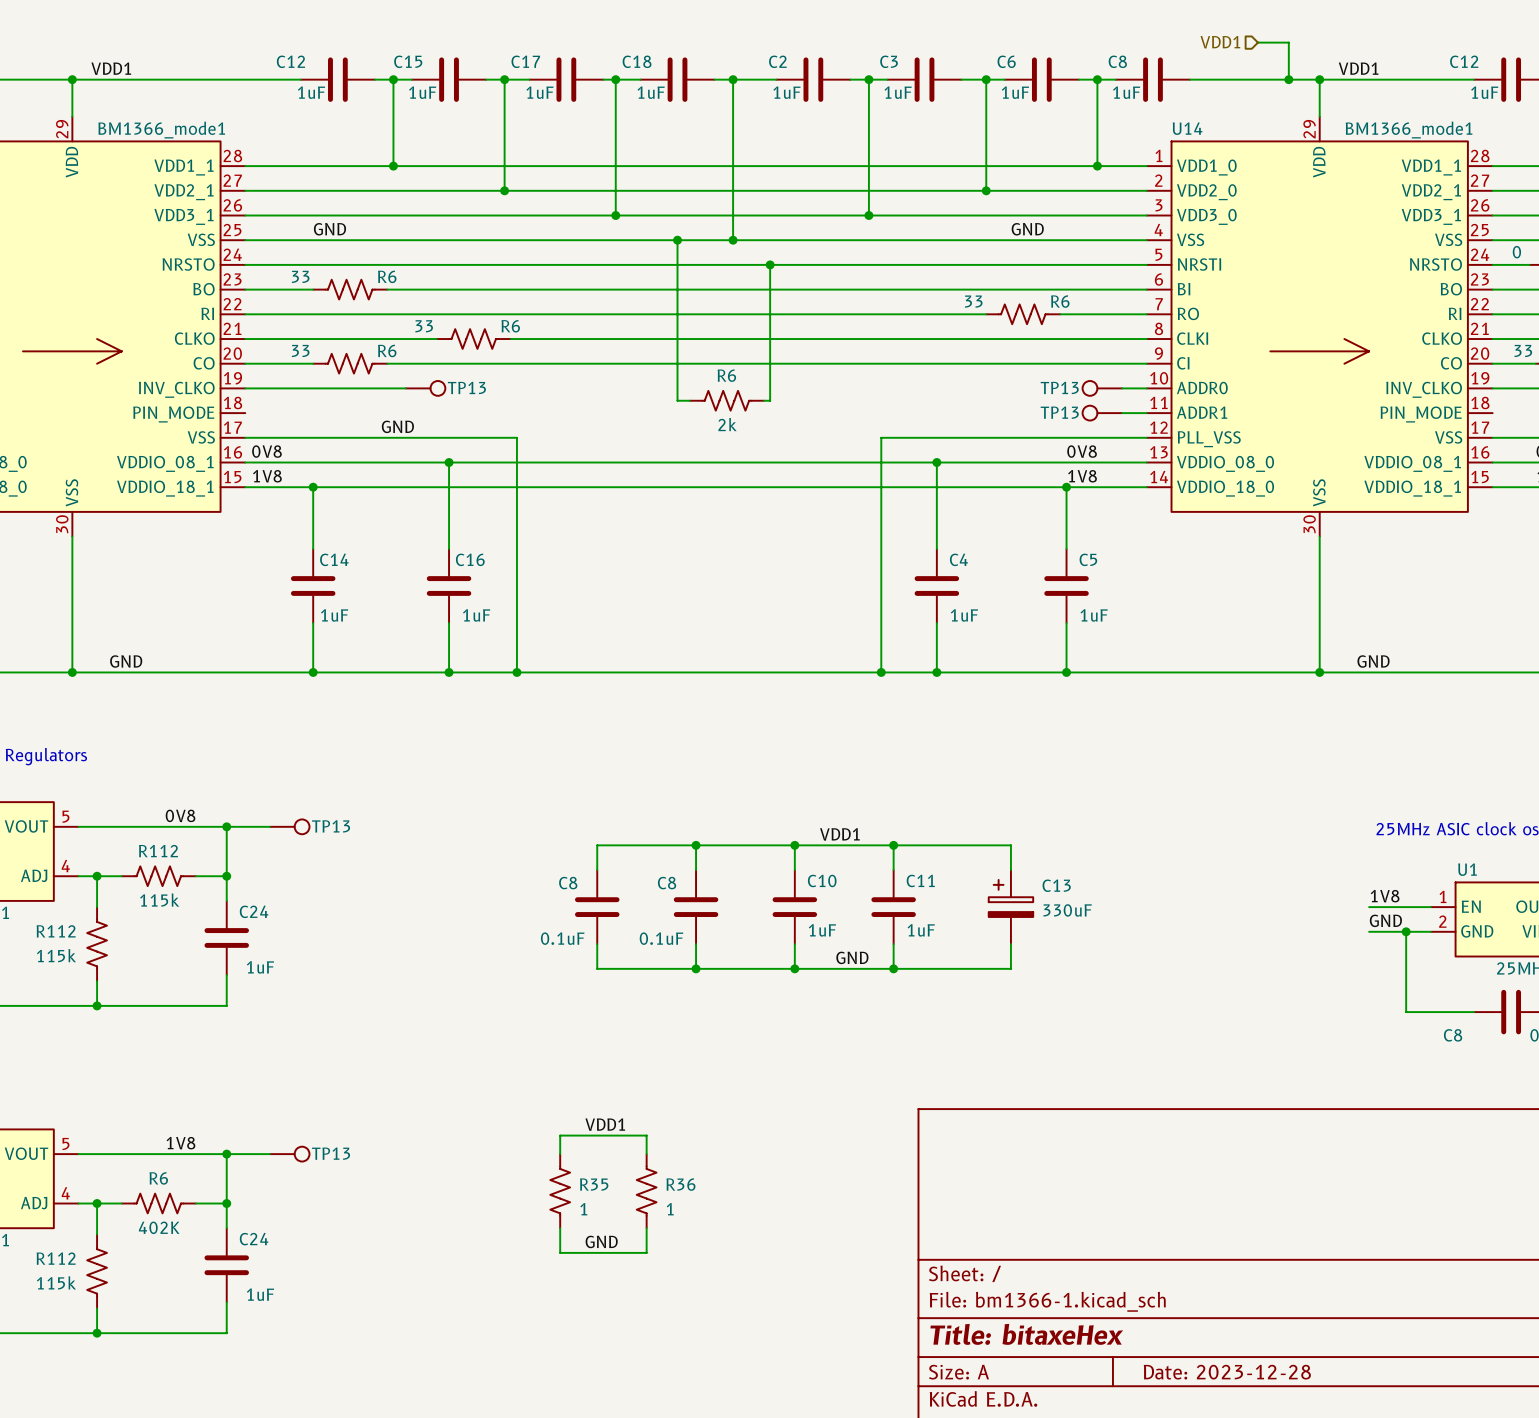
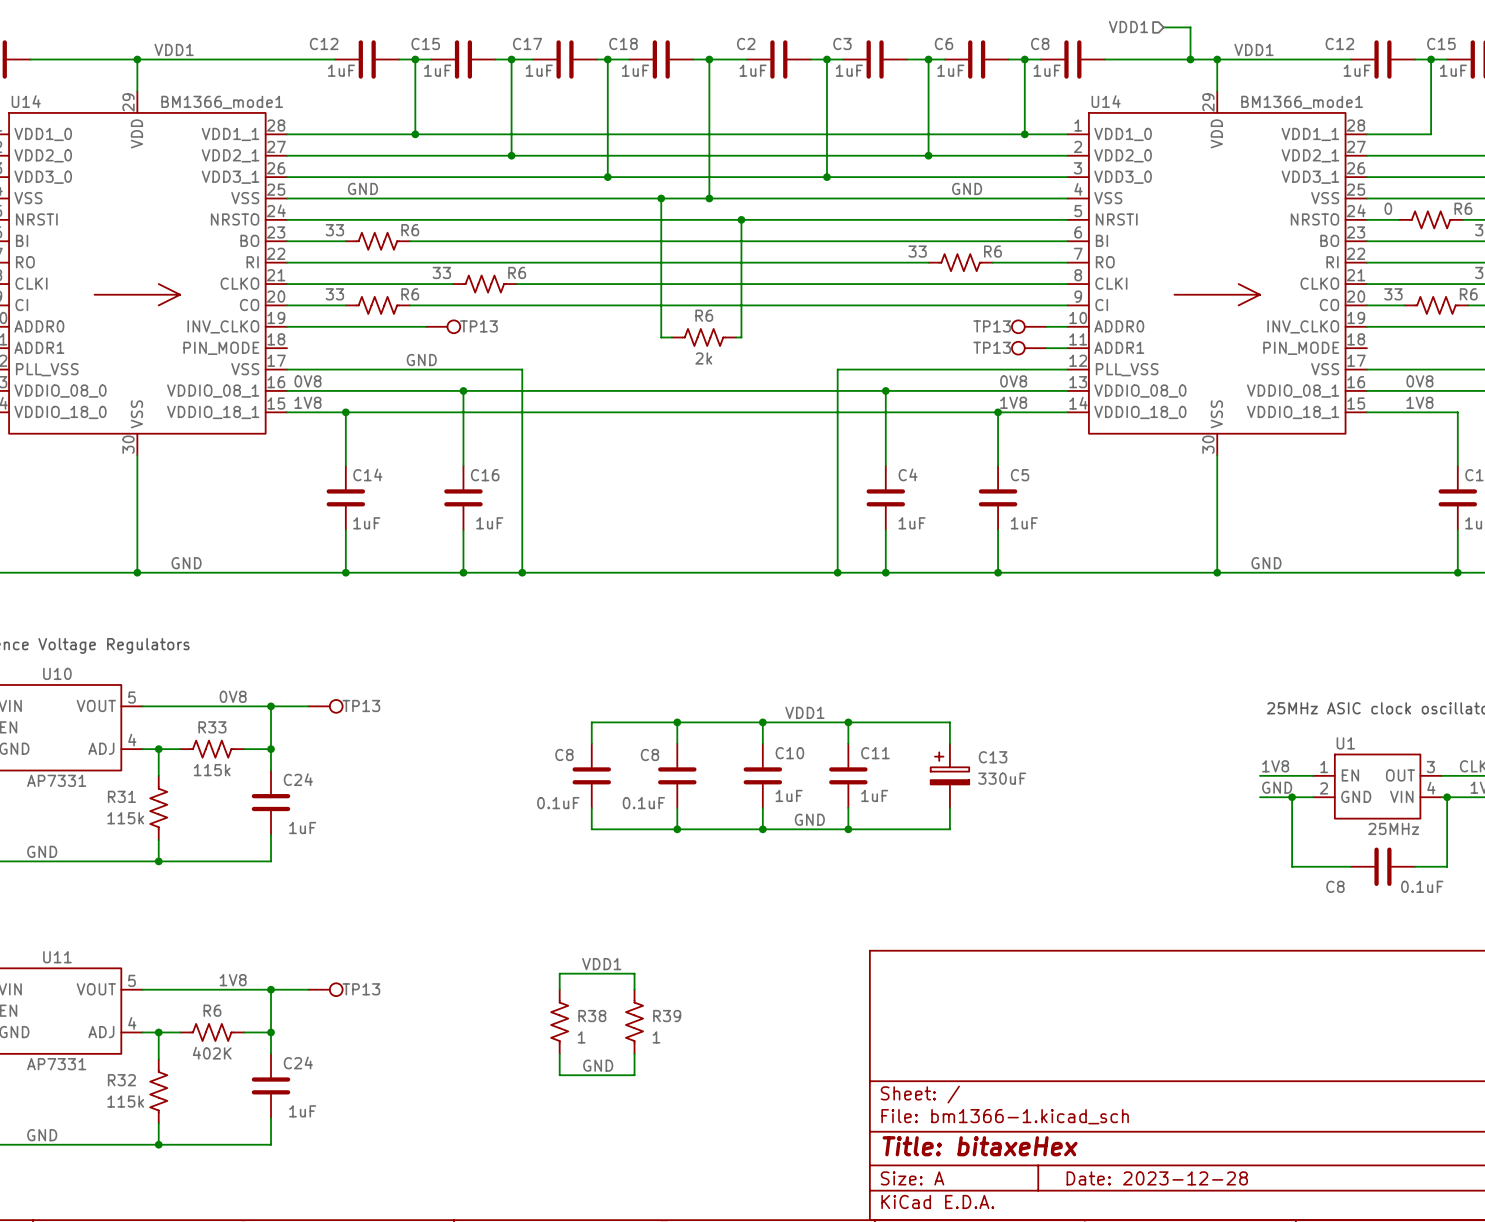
R112 name: R112 (158, 851) -> R33 (212, 727)
R112 name: R112 (56, 931) -> R31 (121, 796)
R35 name: R35 (594, 1184) -> R38 (592, 1016)
R36 name: R36 (680, 1184) -> R39 (667, 1016)
R112 name: R112 (56, 1258) -> R32 (121, 1080)

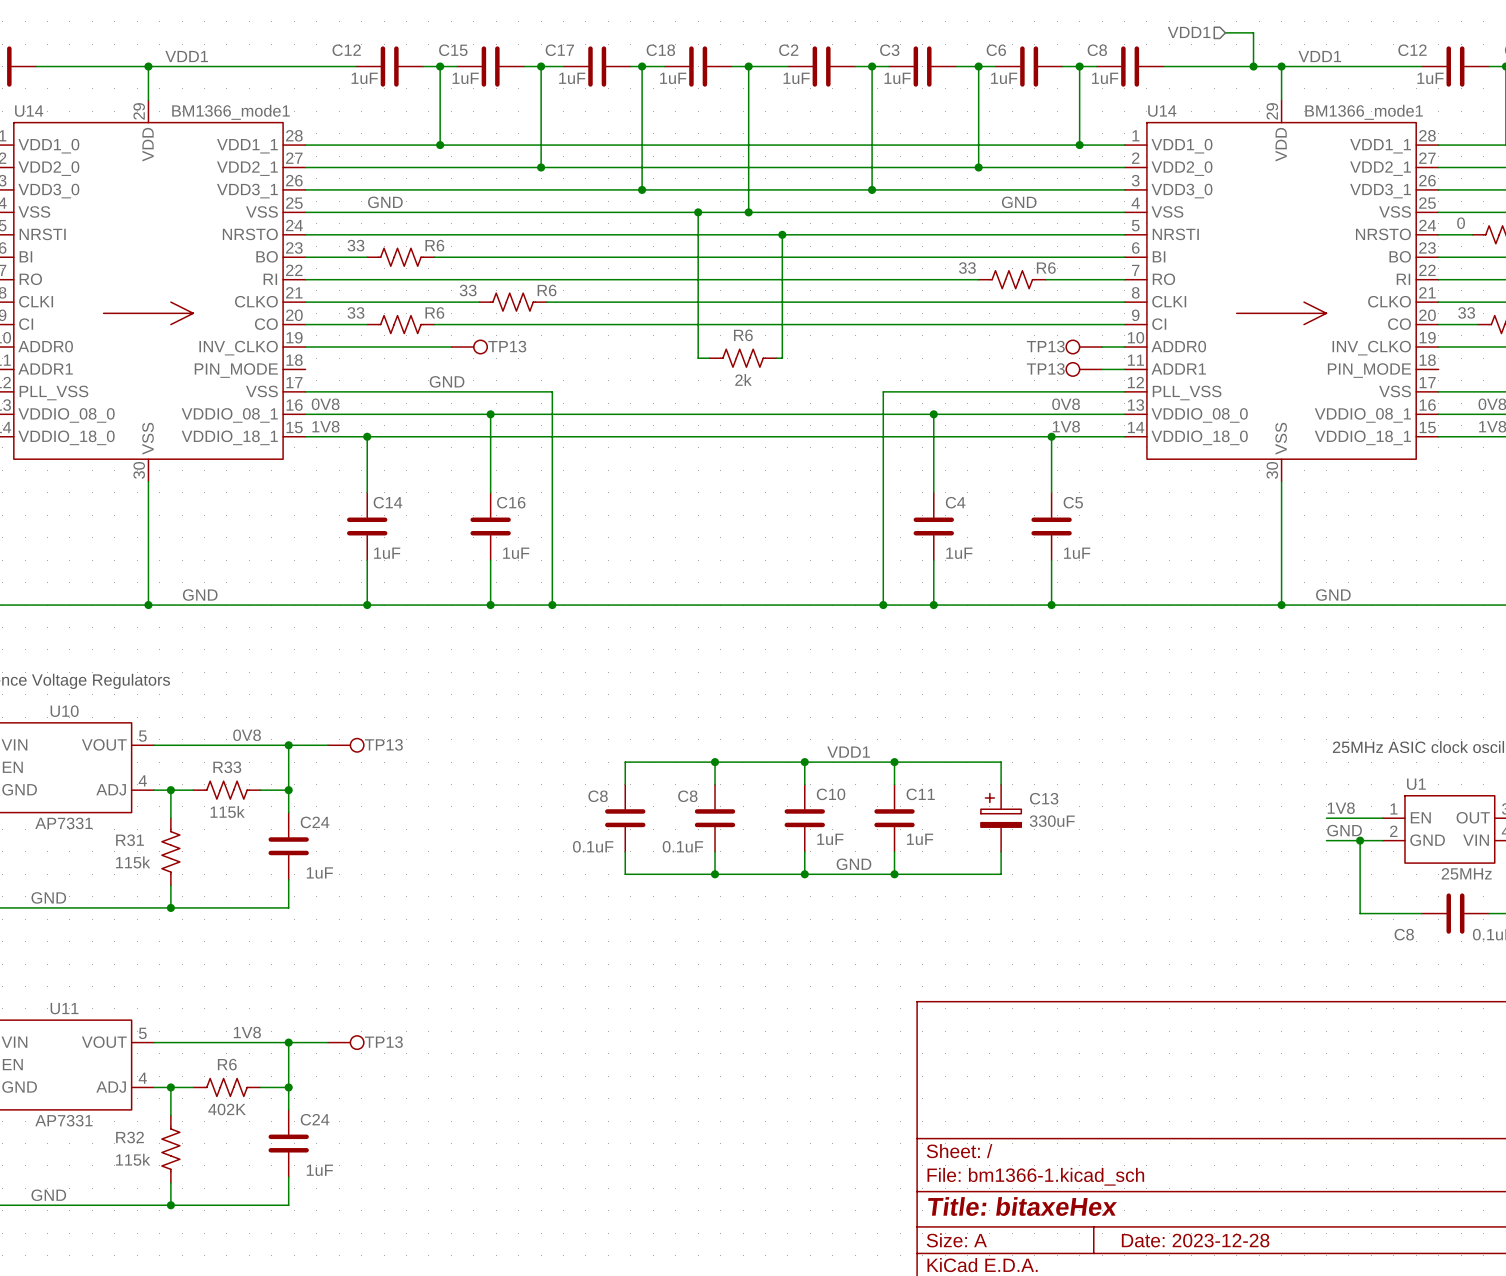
label: VDD1 (601, 964) -> none
wire: (559, 989) (559, 973) (634, 973) (634, 989) -> none
R38: 1 (559, 1021) -> none
R39: 1 (634, 1021) -> none
wire: (559, 1053) (559, 1075) (634, 1075) (634, 1053) -> none
label: GND (598, 1065) -> none

